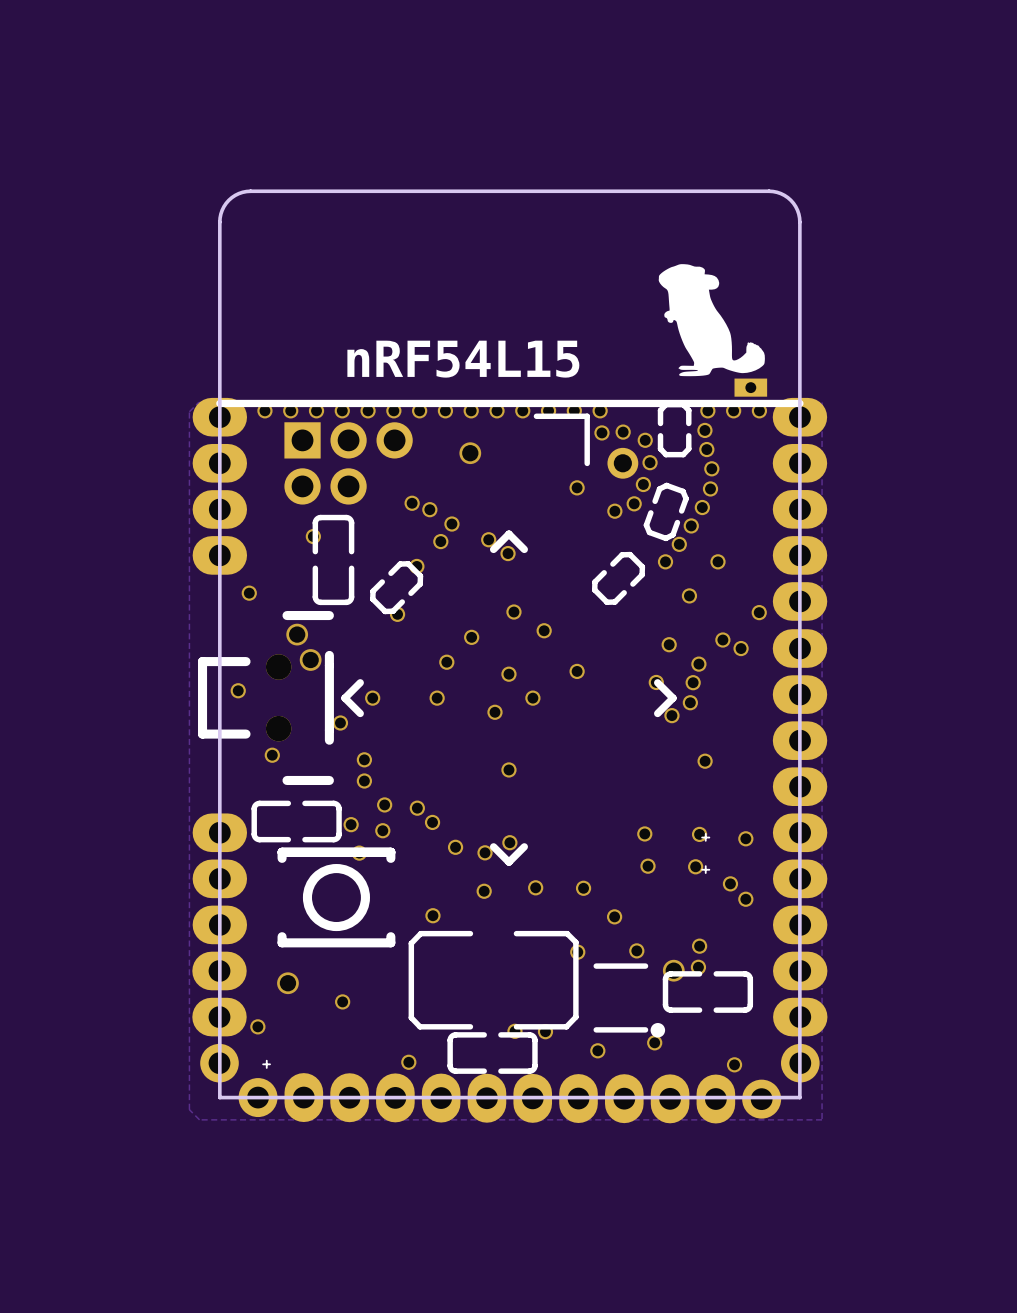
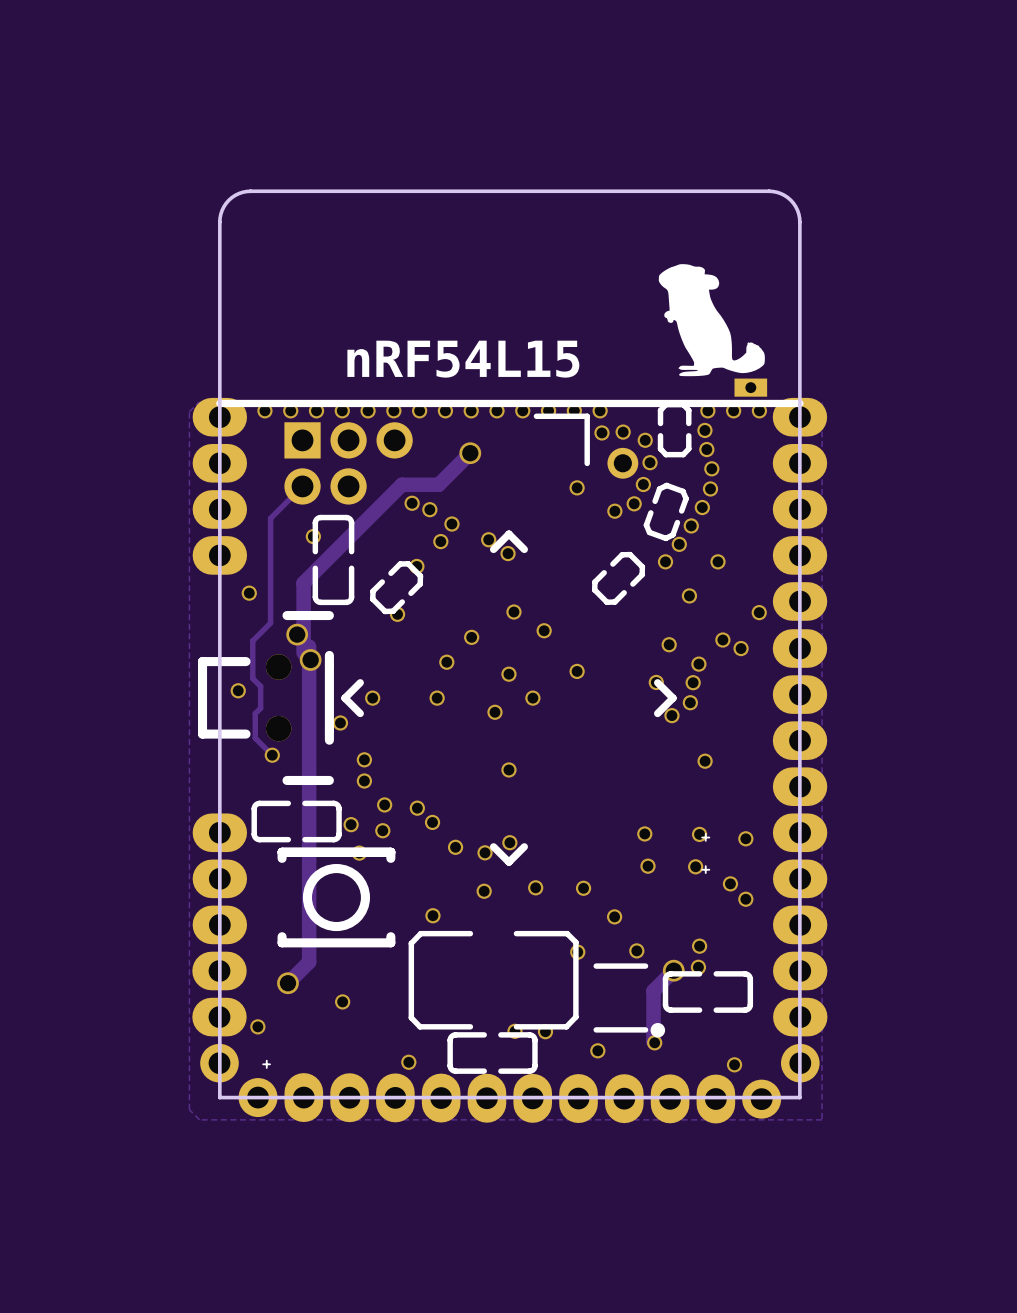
track: none -> (470, 453) (438, 484) (401, 484) (303, 583) (303, 652)
track: none -> (302, 486) (270, 518) (270, 623) (252, 640) (252, 678) (260, 686) (260, 708) (255, 713) (255, 738) (272, 755)
track: none -> (309, 646) (309, 962) (287, 983)
track: none -> (673, 970) (653, 990) (654, 1042)

